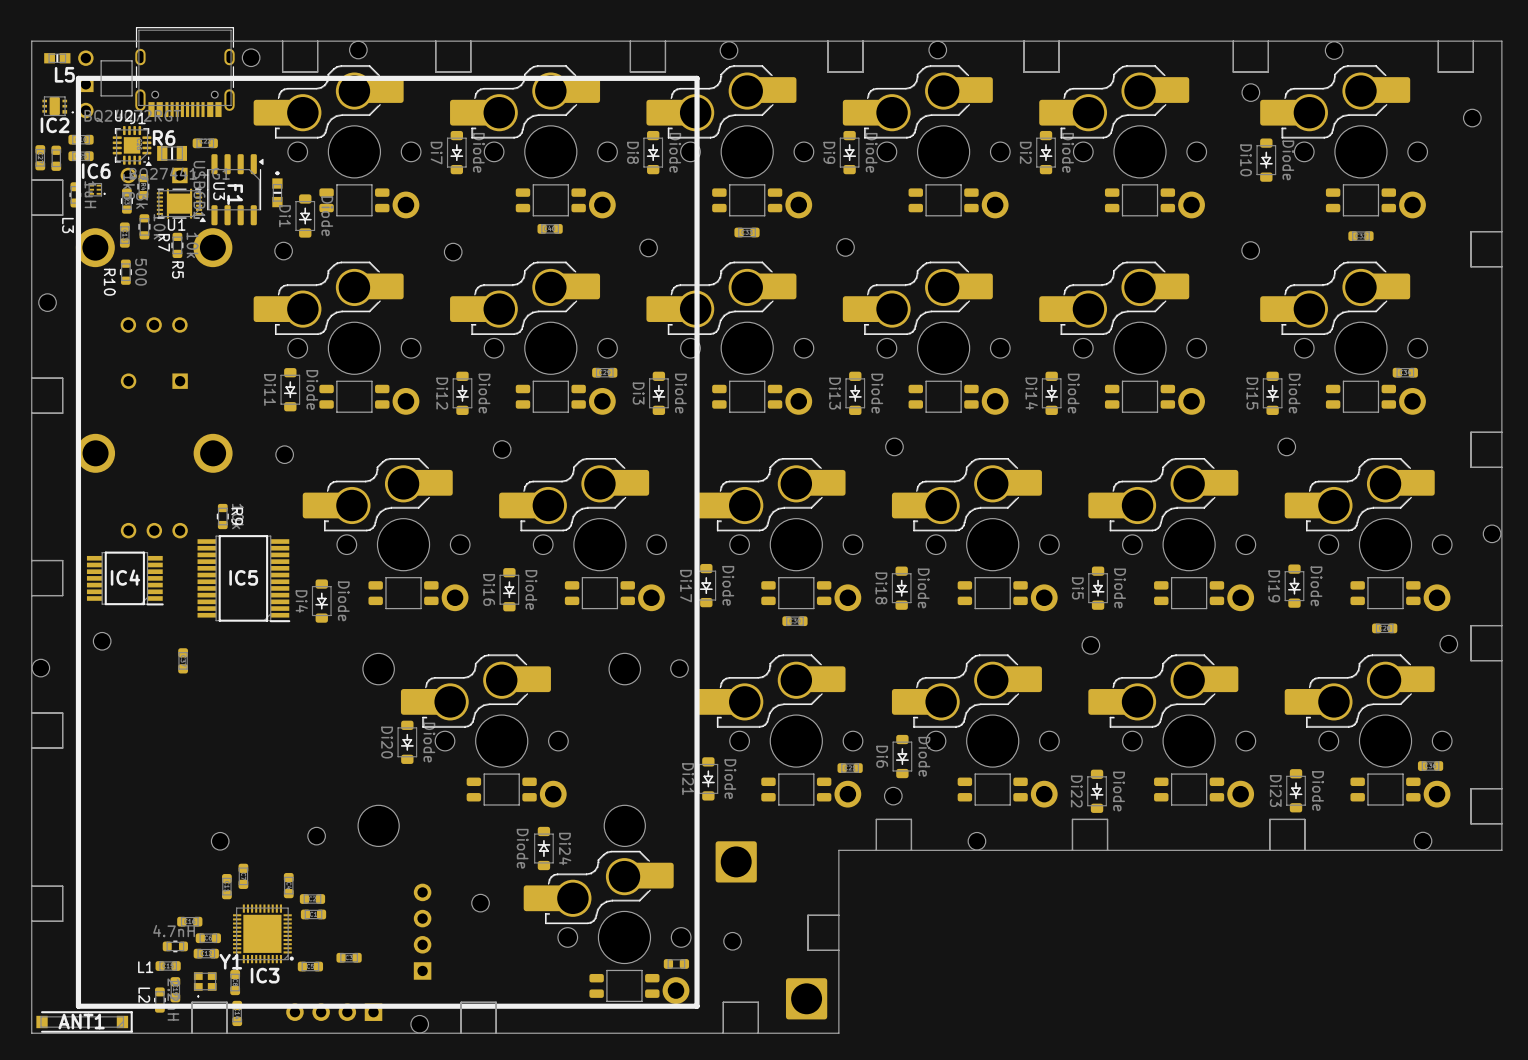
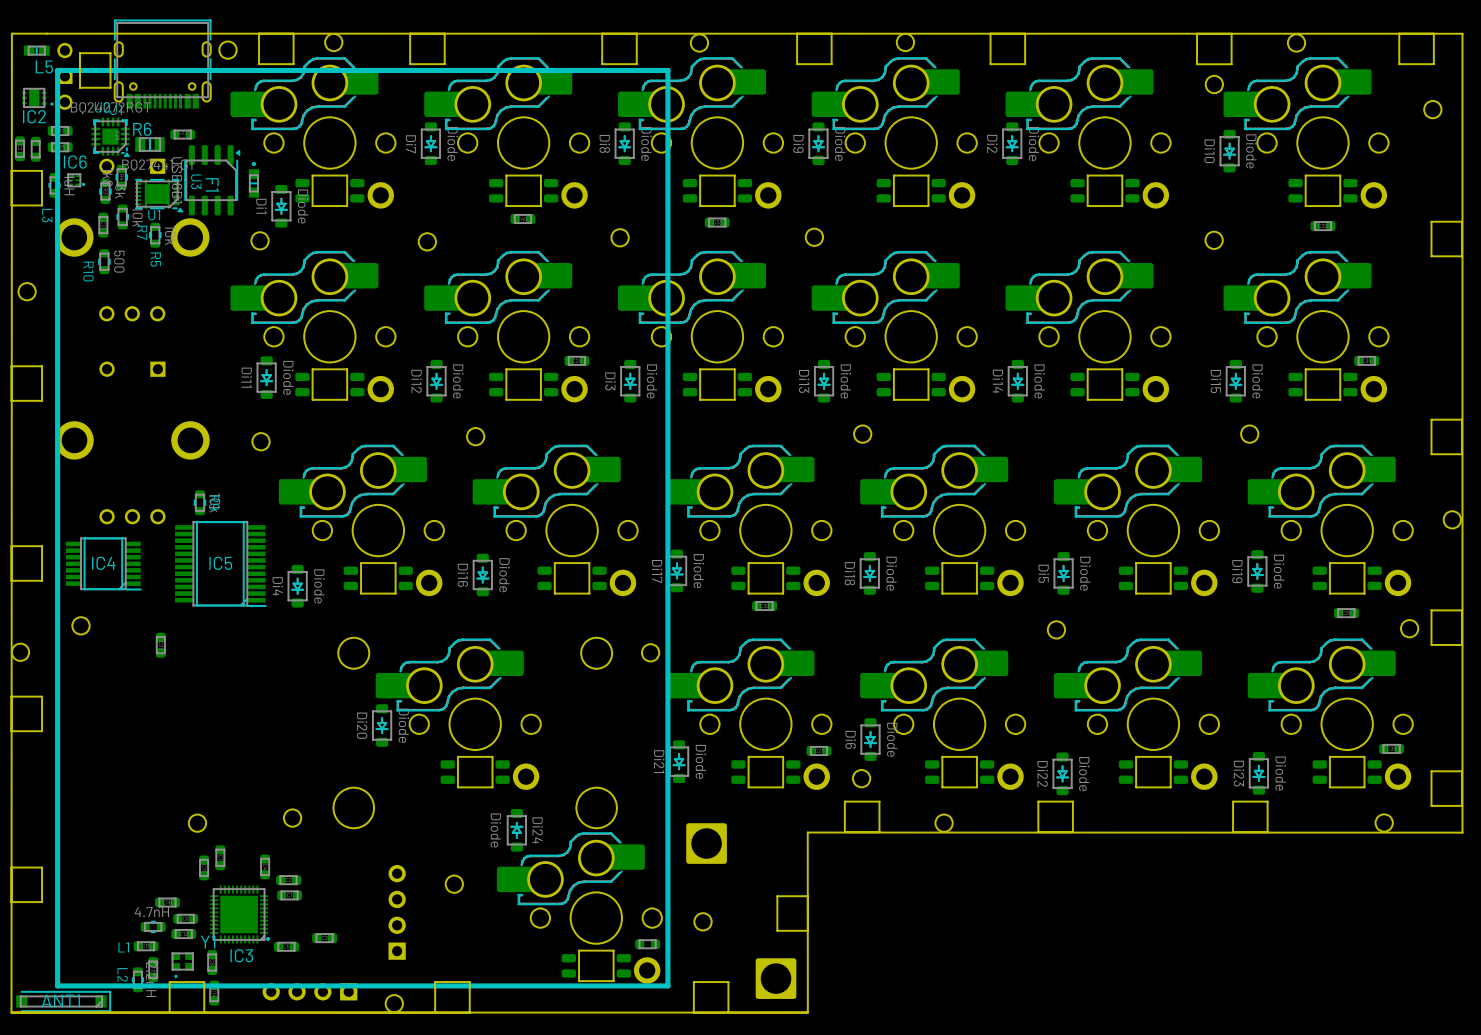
board edge: (227, 1033) (227, 1002) (192, 1002) (192, 1033) -> none
board edge: (496, 1033) (496, 1002) (461, 1002) (461, 1033) -> none
board edge: (758, 1033) (758, 1002) (723, 1002) (723, 1033) -> (469, 1012) (11, 1012) (11, 33) (1462, 33) (1462, 832) (807, 832) (807, 1012) (693, 1012)
board edge: (838, 1033) (838, 950) (807, 950) (807, 915) (838, 915) (838, 850) (876, 850) (876, 819) (911, 819) (911, 850) (1072, 850) (1072, 819) (1107, 819) (1107, 850) (1269, 850) (1269, 819) (1304, 819) (1304, 850) (1501, 850) (1501, 823) (1470, 823) (1470, 788) (1501, 788) (1501, 660) (1470, 660) (1470, 625) (1501, 625) (1501, 467) (1470, 467) (1470, 432) (1501, 432) (1501, 266) (1470, 266) (1470, 231) (1501, 231) (1501, 41) (1473, 41) (1473, 72) (1438, 72) (1438, 41) (1268, 41) (1268, 72) (1233, 72) (1233, 41) (1059, 41) (1059, 72) (1024, 72) (1024, 41) (862, 41) (862, 72) (827, 72) (827, 41) (665, 41) (665, 72) (630, 72) (630, 41) (470, 41) (470, 72) (435, 72) (435, 41) (317, 41) (317, 72) (282, 72) (282, 41) (31, 41) (31, 180) (62, 180) (62, 215) (31, 215) (31, 378) (62, 378) (62, 413) (31, 413) (31, 560) (62, 560) (62, 595) (31, 595) (31, 713) (62, 713) (62, 748) (31, 748) (31, 886) (62, 886) (62, 921) (31, 921) (31, 1033) -> none

